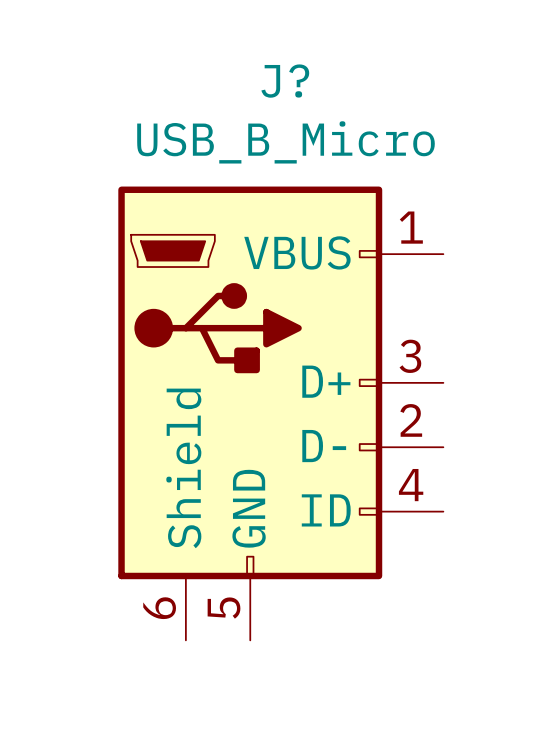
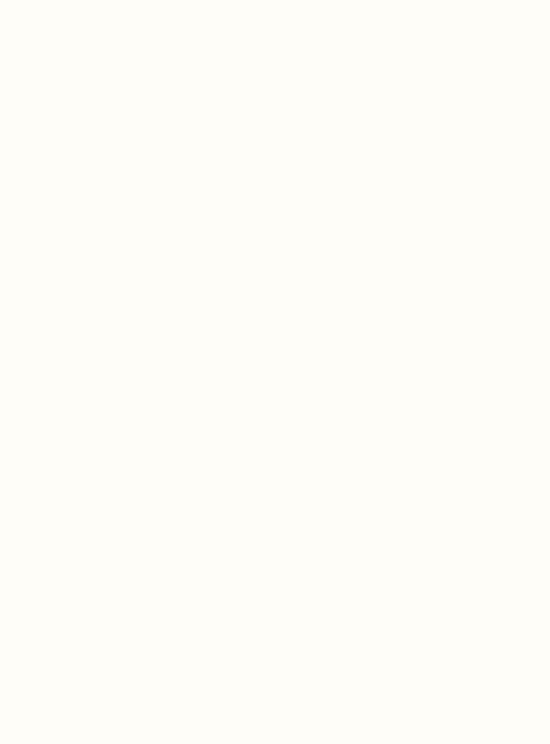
J?: USB_B_Micro (280, 413) -> none

